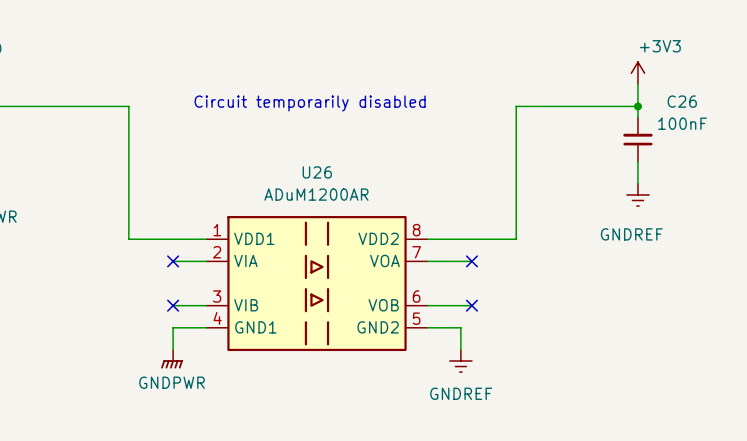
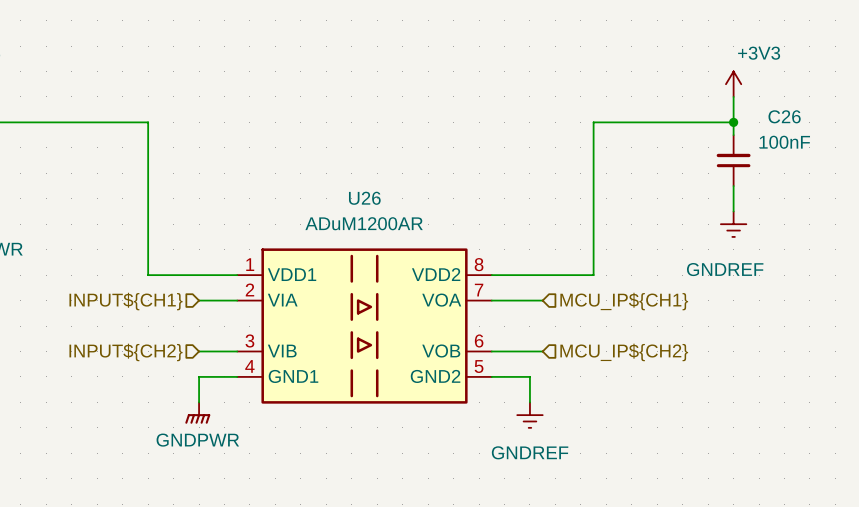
text: Circuit temporarily disabled (310, 103) -> none
no-connect mark: (173, 261) -> none
no-connect mark: (471, 261) -> none
hierarchical label: none -> INPUT${CH1} (126, 301)
hierarchical label: none -> MCU_IP${CH1} (624, 301)
no-connect mark: (173, 305) -> none
no-connect mark: (471, 305) -> none
hierarchical label: none -> INPUT${CH2} (126, 352)
hierarchical label: none -> MCU_IP${CH2} (624, 352)

